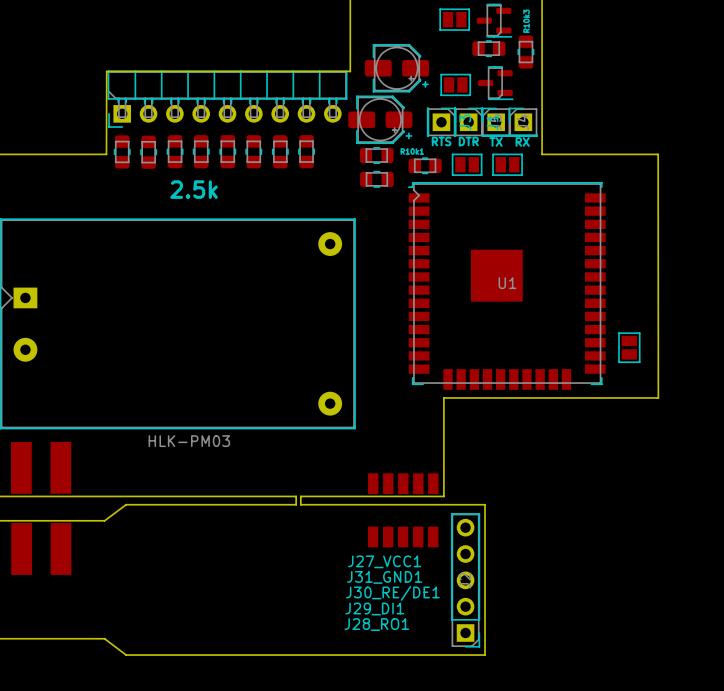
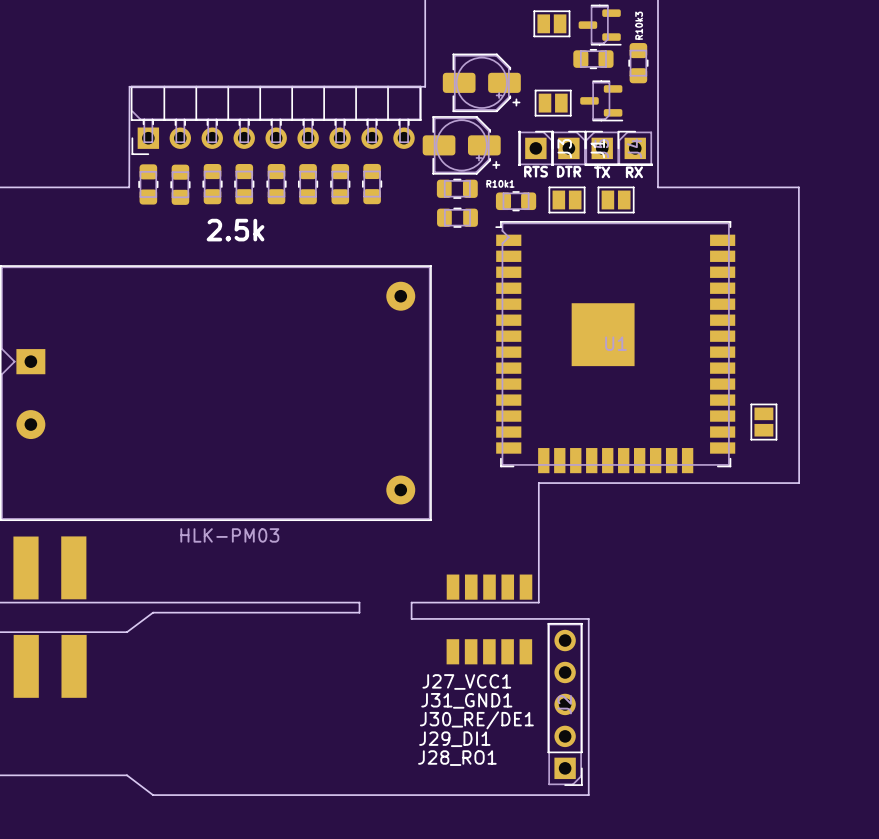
board edge: (339, 496) (300, 496) (300, 504) (485, 504) (485, 509) -> (411, 602) (411, 618) (588, 618)

